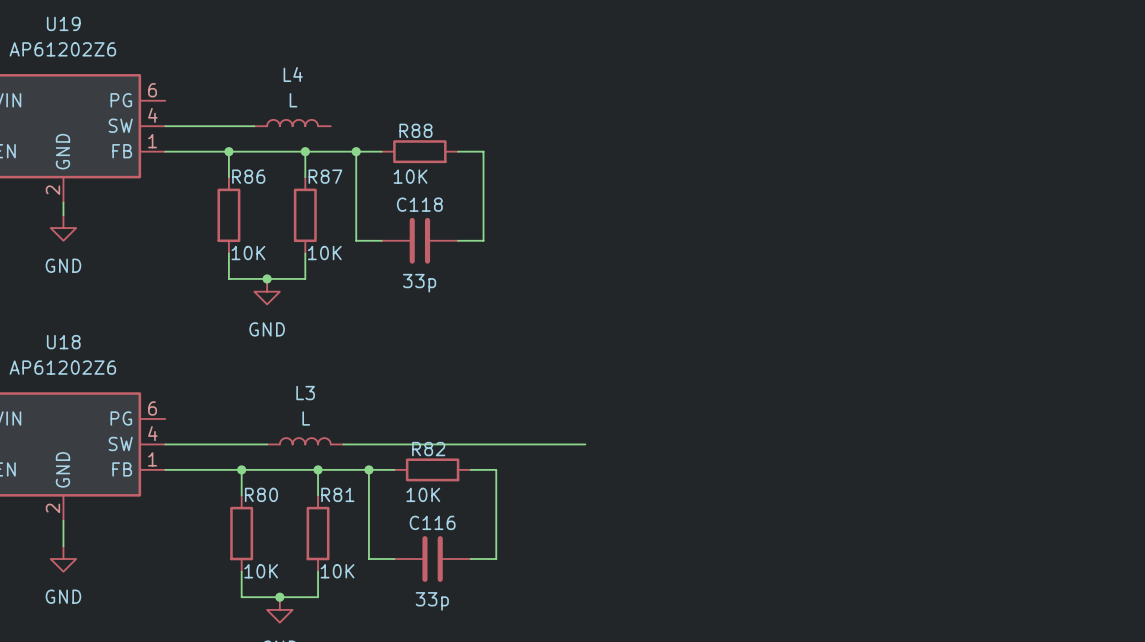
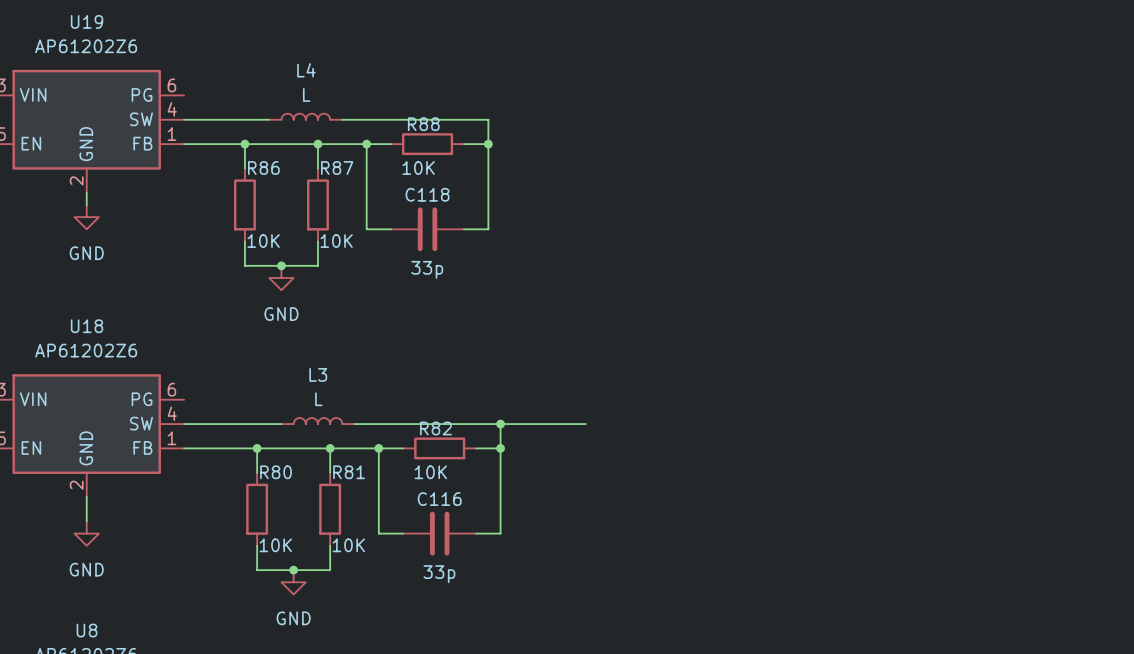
wire: none -> (342, 119) (488, 119) (488, 144)
junction: none -> (488, 144)
wire: none -> (500, 424) (500, 448)
junction: none -> (500, 424)
junction: none -> (500, 448)

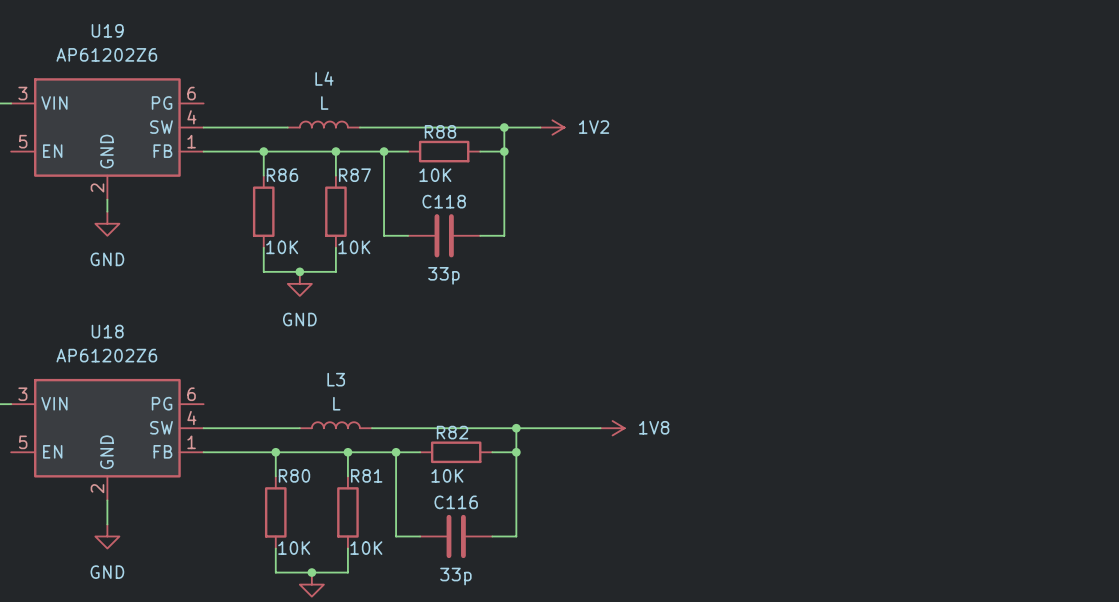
wire: none -> (504, 127) (540, 127)
junction: none -> (504, 127)
power symbol: none -> 1V2 (552, 127)
power symbol: none -> 1V8 (612, 428)

